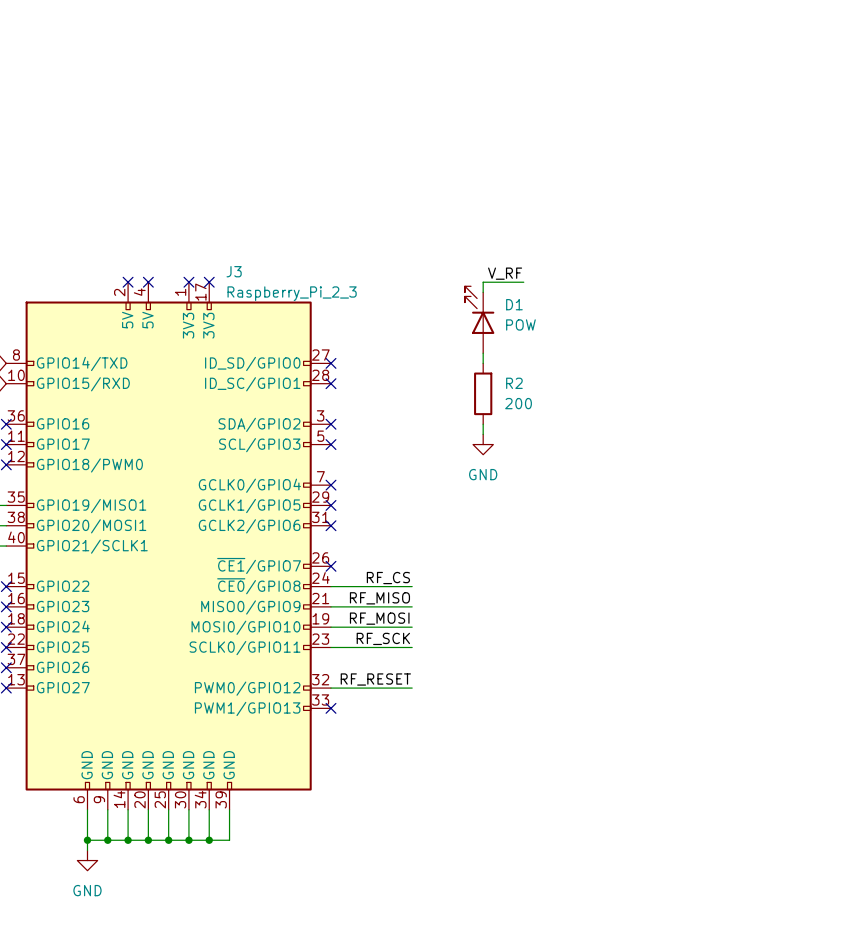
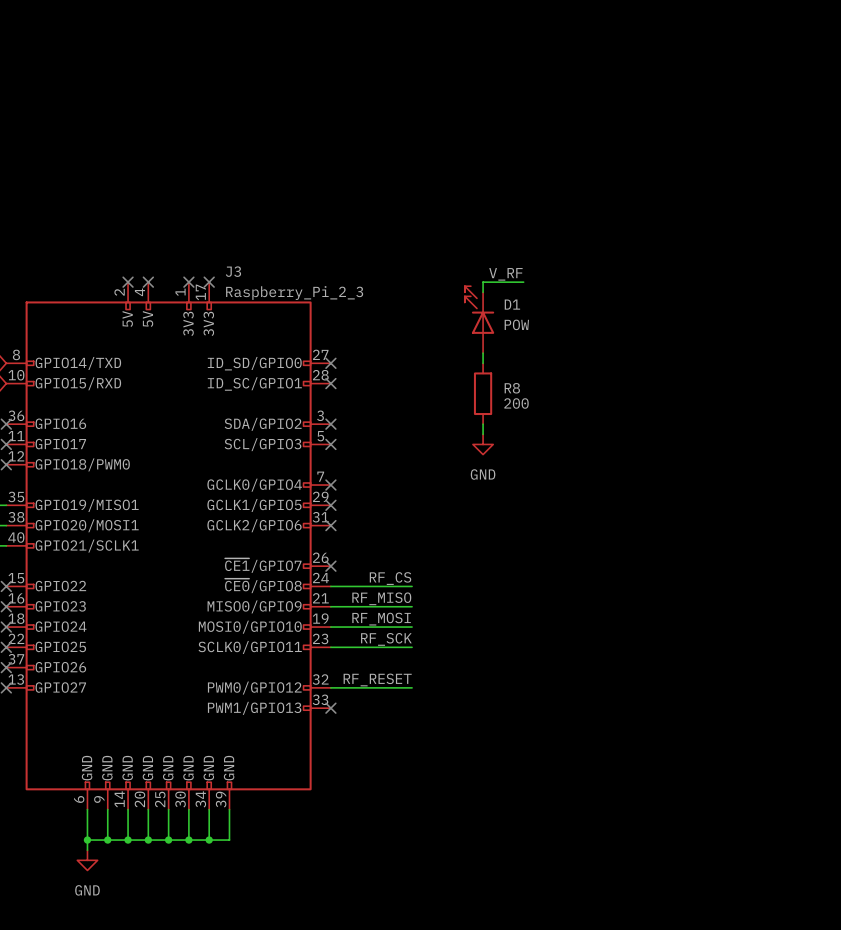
R2 name: R2 (514, 383) -> R8 (512, 388)

